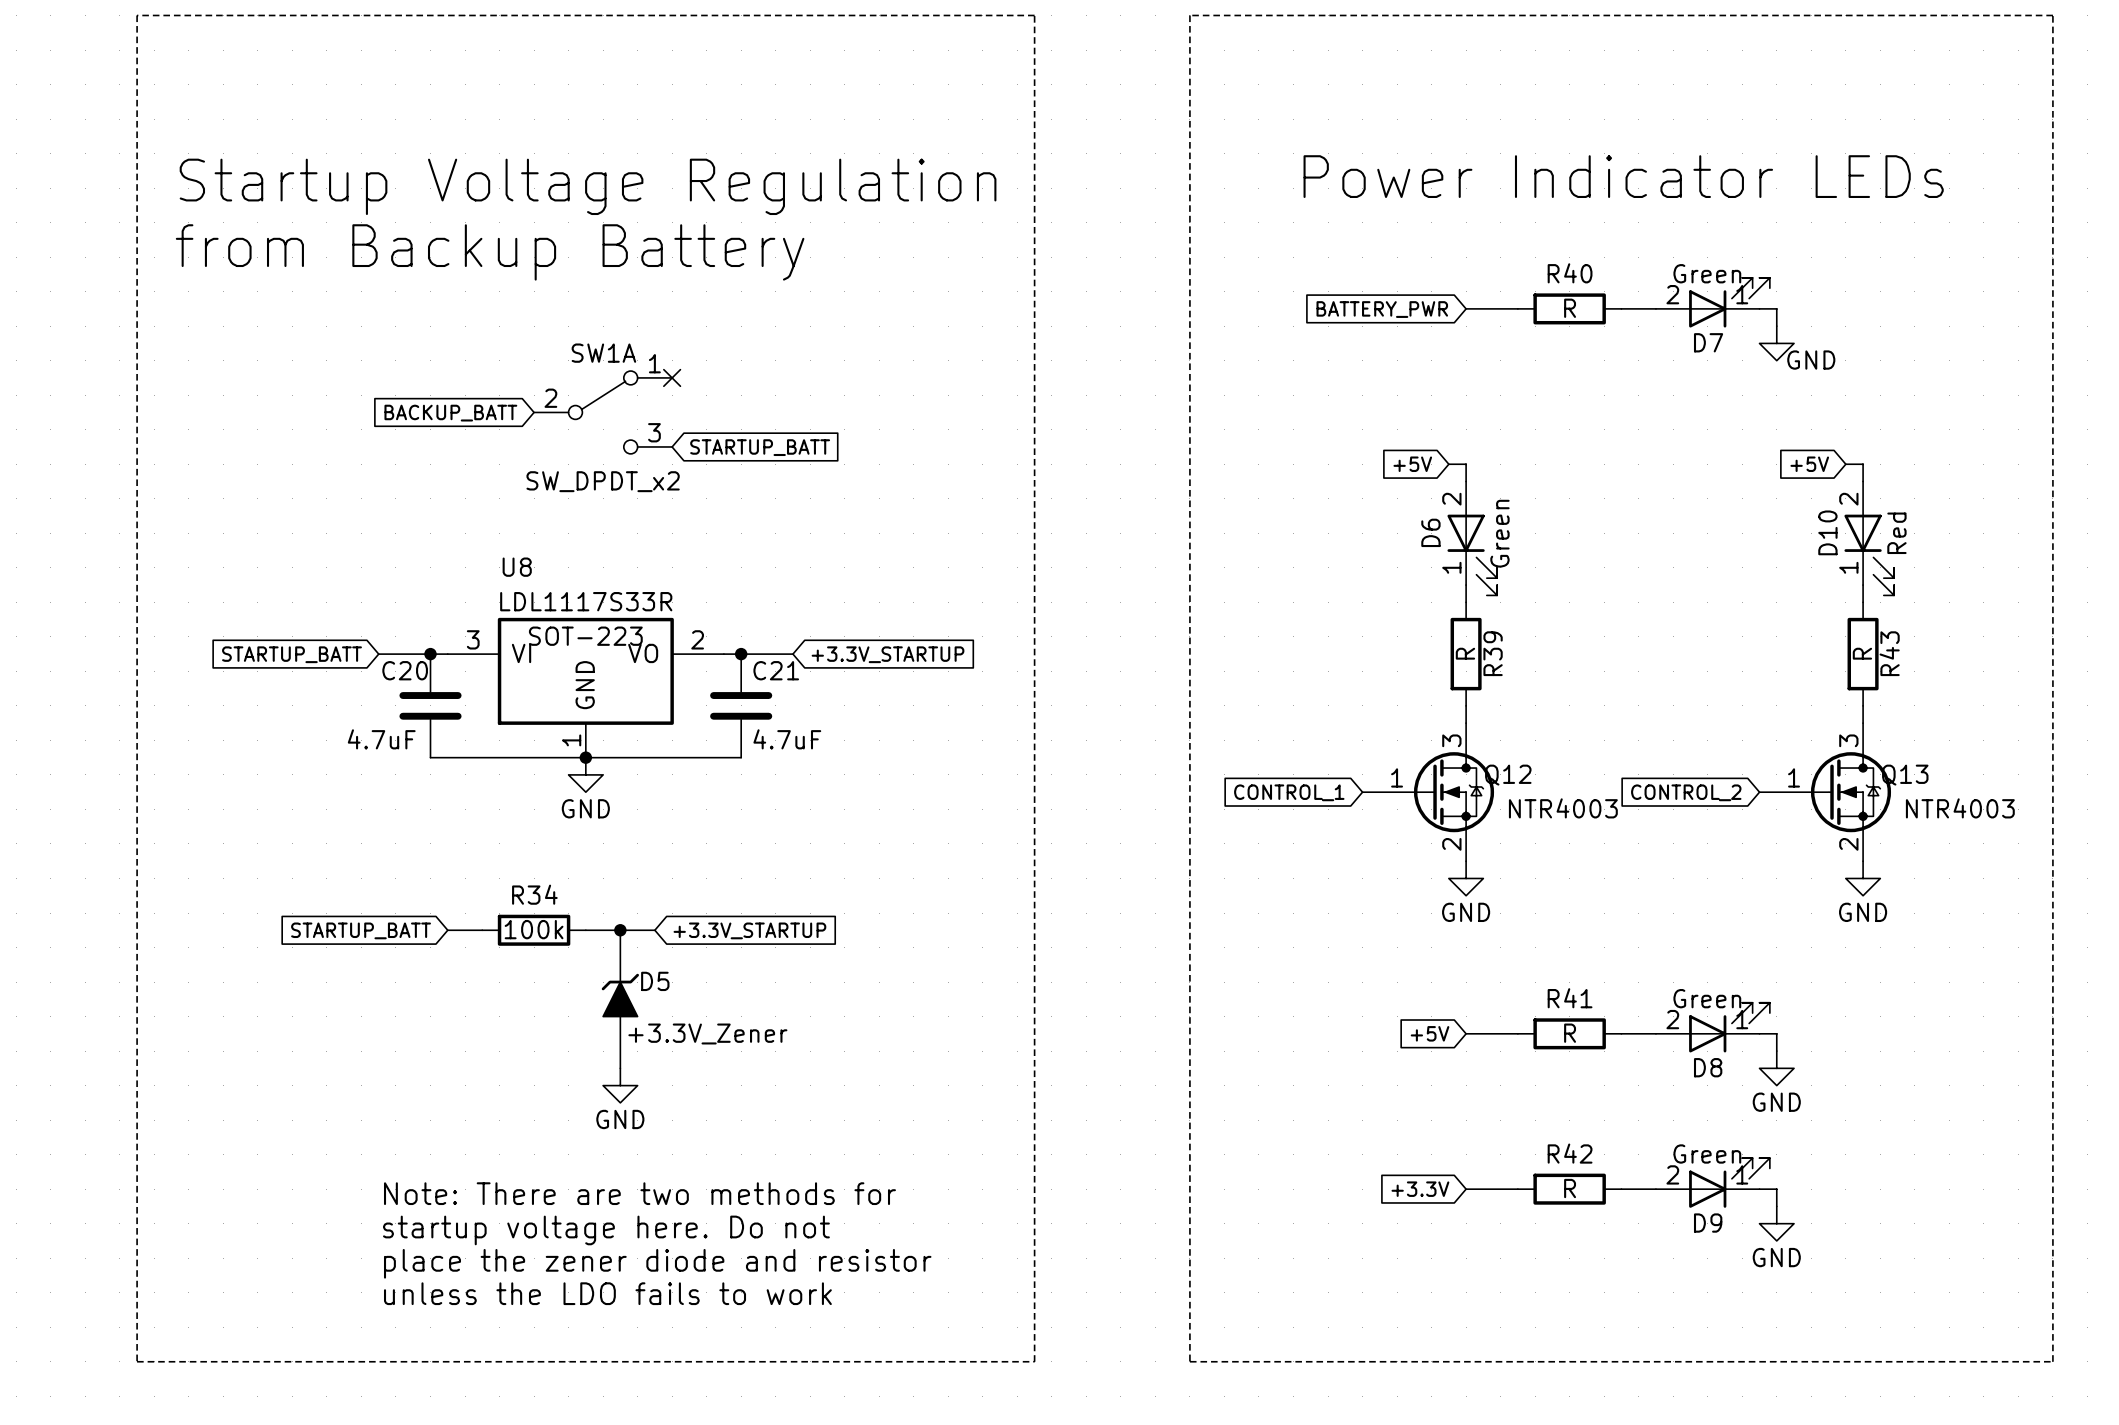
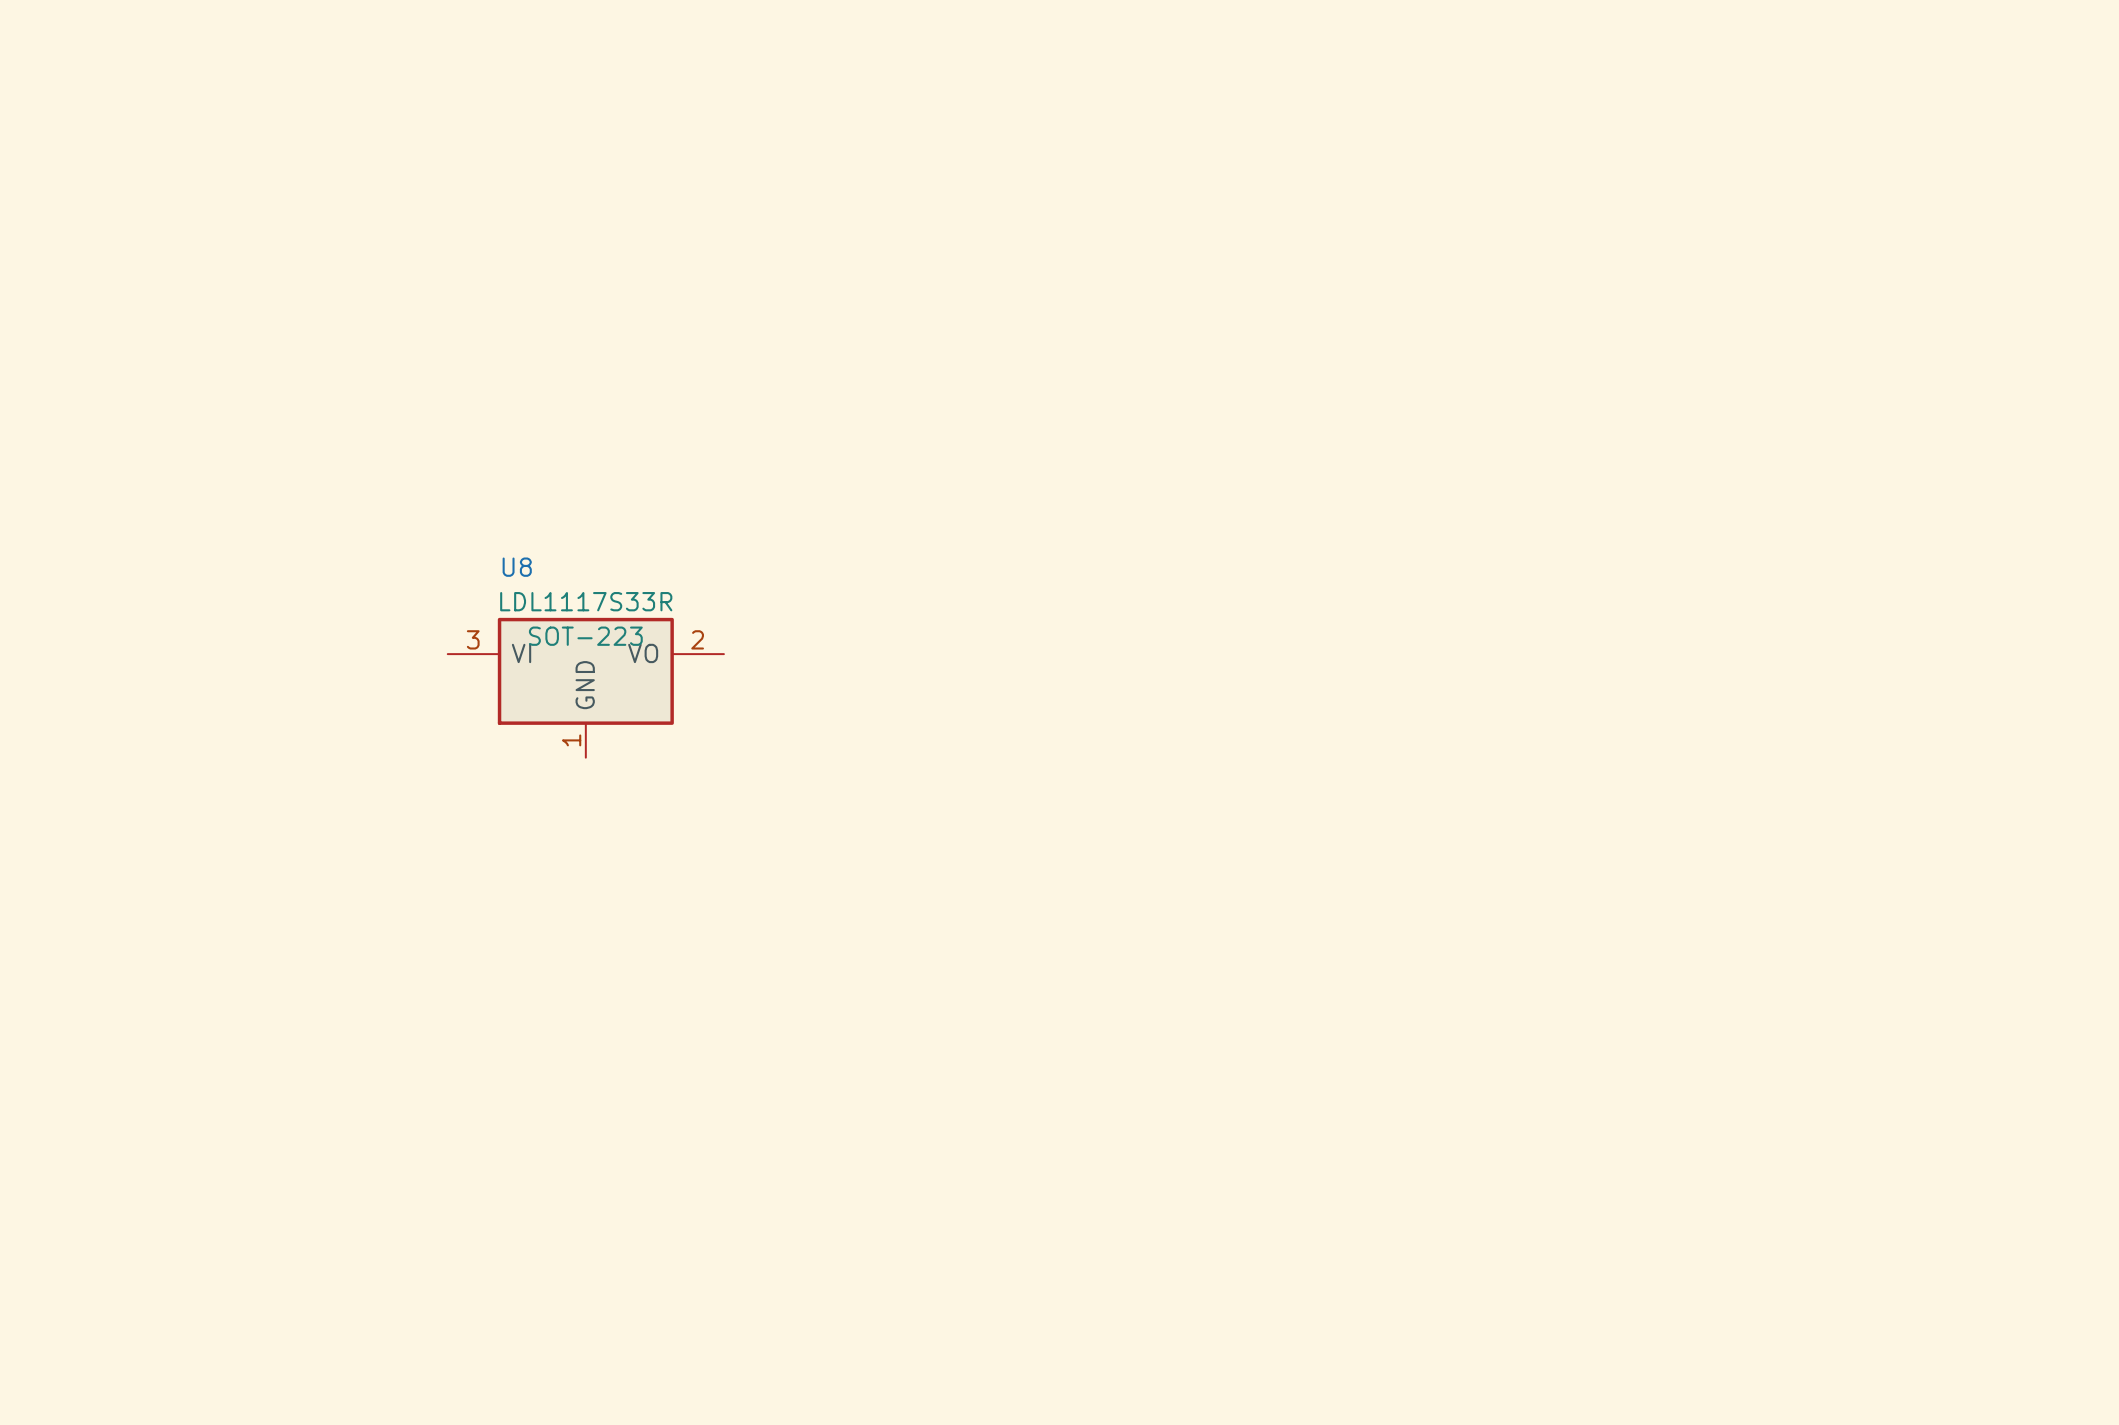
line: (137, 15) (1034, 15) (1034, 1361) (137, 1361) (137, 15) -> none
line: (1189, 15) (2052, 15) (2052, 1361) (1189, 1361) (1189, 15) -> none
text: Power Indicator LEDs (1623, 176) -> none
text: Startup Voltage Regulation (588, 186) -> none
text: from Backup Battery (490, 252) -> none
D7: Green (1712, 302) -> none
wire: (1466, 308) (1517, 308) -> none
R40: R (1569, 308) -> none
wire: (1621, 308) (1655, 308) -> none
wire: (1759, 308) (1776, 308) (1776, 326) -> none
global label: BATTERY_PWR (1382, 309) -> none
power symbol: GND (1776, 343) -> none
no-connect mark: (672, 377) -> none
SW1A: SW_DPDT_x2 (603, 412) -> none
global label: BACKUP_BATT (450, 413) -> none
global label: STARTUP_BATT (760, 447) -> none
global label: +5V (1412, 464) -> none
wire: (1448, 464) (1466, 464) (1466, 481) -> none
global label: +5V (1809, 464) -> none
wire: (1845, 464) (1863, 464) (1863, 481) -> none
D6: Green (1472, 538) -> none
D10: Red (1869, 538) -> none
wire: (1466, 585) (1466, 602) -> none
wire: (1863, 585) (1863, 602) -> none
global label: STARTUP_BATT (292, 654) -> none
wire: (378, 654) (447, 654) -> none
junction: (430, 654) -> none
wire: (723, 654) (792, 654) -> none
junction: (741, 654) -> none
global label: +3.3V_STARTUP (888, 654) -> none
R39: R (1466, 654) -> none
R43: R (1863, 654) -> none
C20: 4.7uF (430, 705) -> none
C21: 4.7uF (741, 705) -> none
wire: (1466, 705) (1466, 723) -> none
wire: (1863, 705) (1863, 723) -> none
wire: (430, 757) (741, 757) -> none
junction: (585, 757) -> none
power symbol: GND (585, 774) -> none
global label: CONTROL_1 (1289, 792) -> none
Q12: NTR4003 (1428, 792) -> none
global label: CONTROL_2 (1686, 792) -> none
Q13: NTR4003 (1825, 792) -> none
power symbol: GND (1466, 878) -> none
power symbol: GND (1863, 878) -> none
global label: STARTUP_BATT (361, 930) -> none
wire: (447, 930) (482, 930) -> none
R34: 100k (534, 930) -> none
wire: (585, 930) (654, 930) -> none
junction: (620, 930) -> none
global label: +3.3V_STARTUP (749, 930) -> none
D5: +3.3V_Zener (620, 999) -> none
D8: Green (1712, 1027) -> none
global label: +5V (1430, 1033) -> none
wire: (1466, 1033) (1517, 1033) -> none
R41: R (1569, 1033) -> none
wire: (1621, 1033) (1655, 1033) -> none
wire: (1759, 1033) (1776, 1033) (1776, 1051) -> none
power symbol: GND (1776, 1068) -> none
power symbol: GND (620, 1085) -> none
D9: Green (1712, 1182) -> none
global label: +3.3V (1420, 1189) -> none
wire: (1466, 1189) (1517, 1189) -> none
R42: R (1569, 1189) -> none
wire: (1621, 1189) (1655, 1189) -> none
wire: (1759, 1189) (1776, 1189) (1776, 1206) -> none
text: Note: There are two methods for (639, 1193) -> none
power symbol: GND (1776, 1223) -> none
text: startup voltage here. Do not (606, 1230) -> none
text: place the zener diode and resistor (657, 1263) -> none
text: unless the LDO fails to work (607, 1293) -> none

